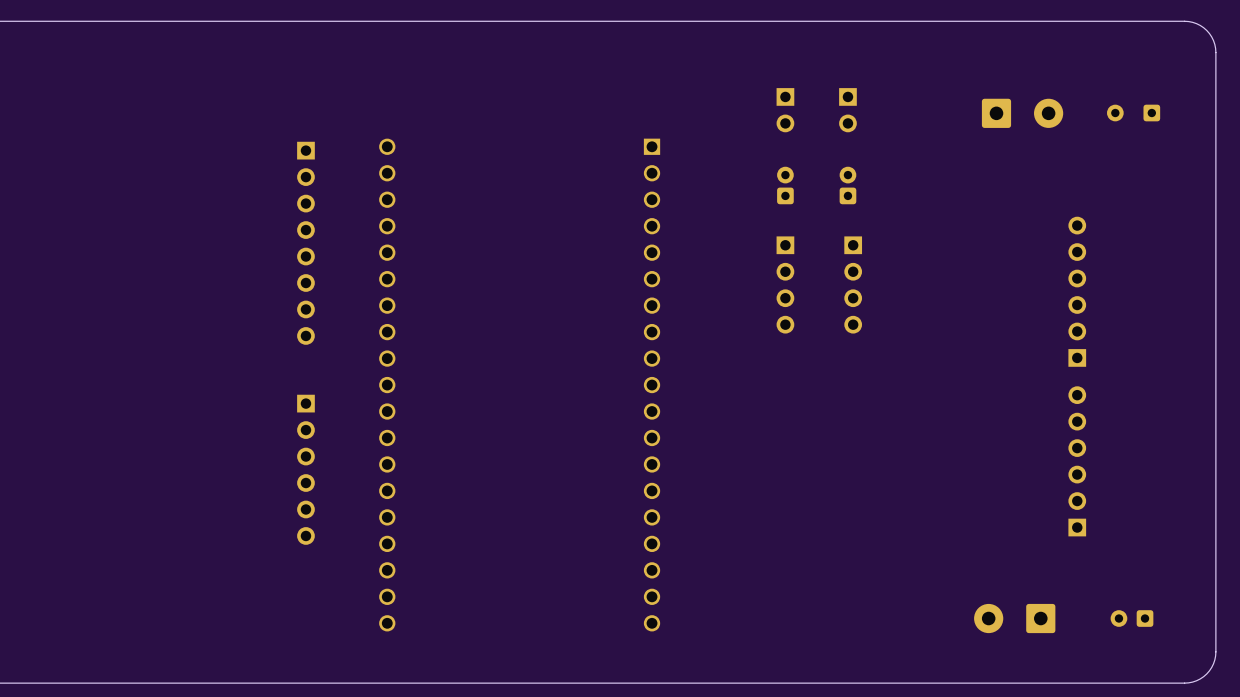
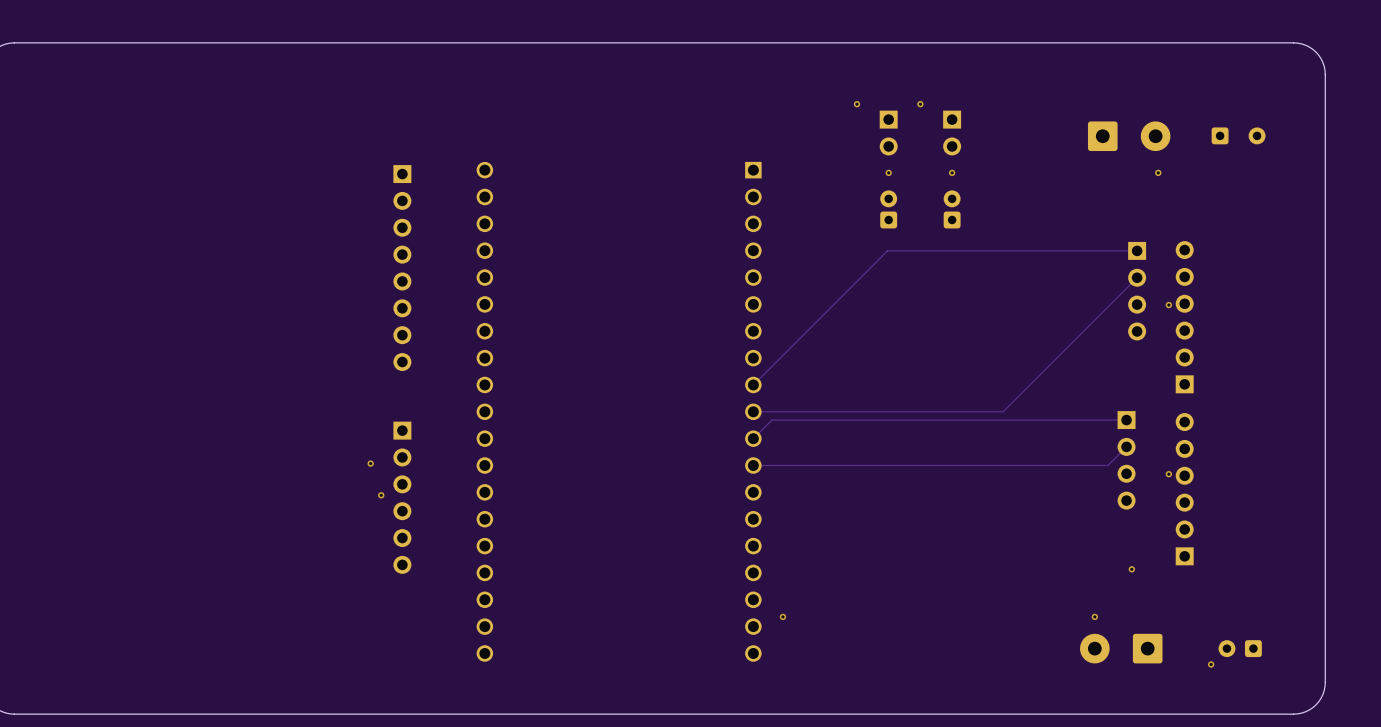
via: none -> (856, 104)
via: none -> (920, 104)
part rotation: 0° (1133, 113) -> 180° (1238, 135)
via: none -> (888, 172)
via: none -> (952, 172)
via: none -> (1158, 172)
track: none -> (1137, 250) (887, 250) (753, 384)
track: none -> (1137, 277) (1003, 411) (753, 411)
part: none -> (1137, 291)
via: none -> (1168, 305)
part: (785, 284) -> none
part: (853, 284) -> none
track: none -> (1126, 420) (771, 420) (753, 438)
track: none -> (1126, 446) (1107, 465) (753, 465)
part: none -> (1126, 460)
via: none -> (370, 463)
via: none -> (1168, 474)
via: none -> (381, 495)
via: none -> (1131, 569)
via: none -> (782, 616)
via: none -> (1094, 616)
via: none -> (1211, 664)

